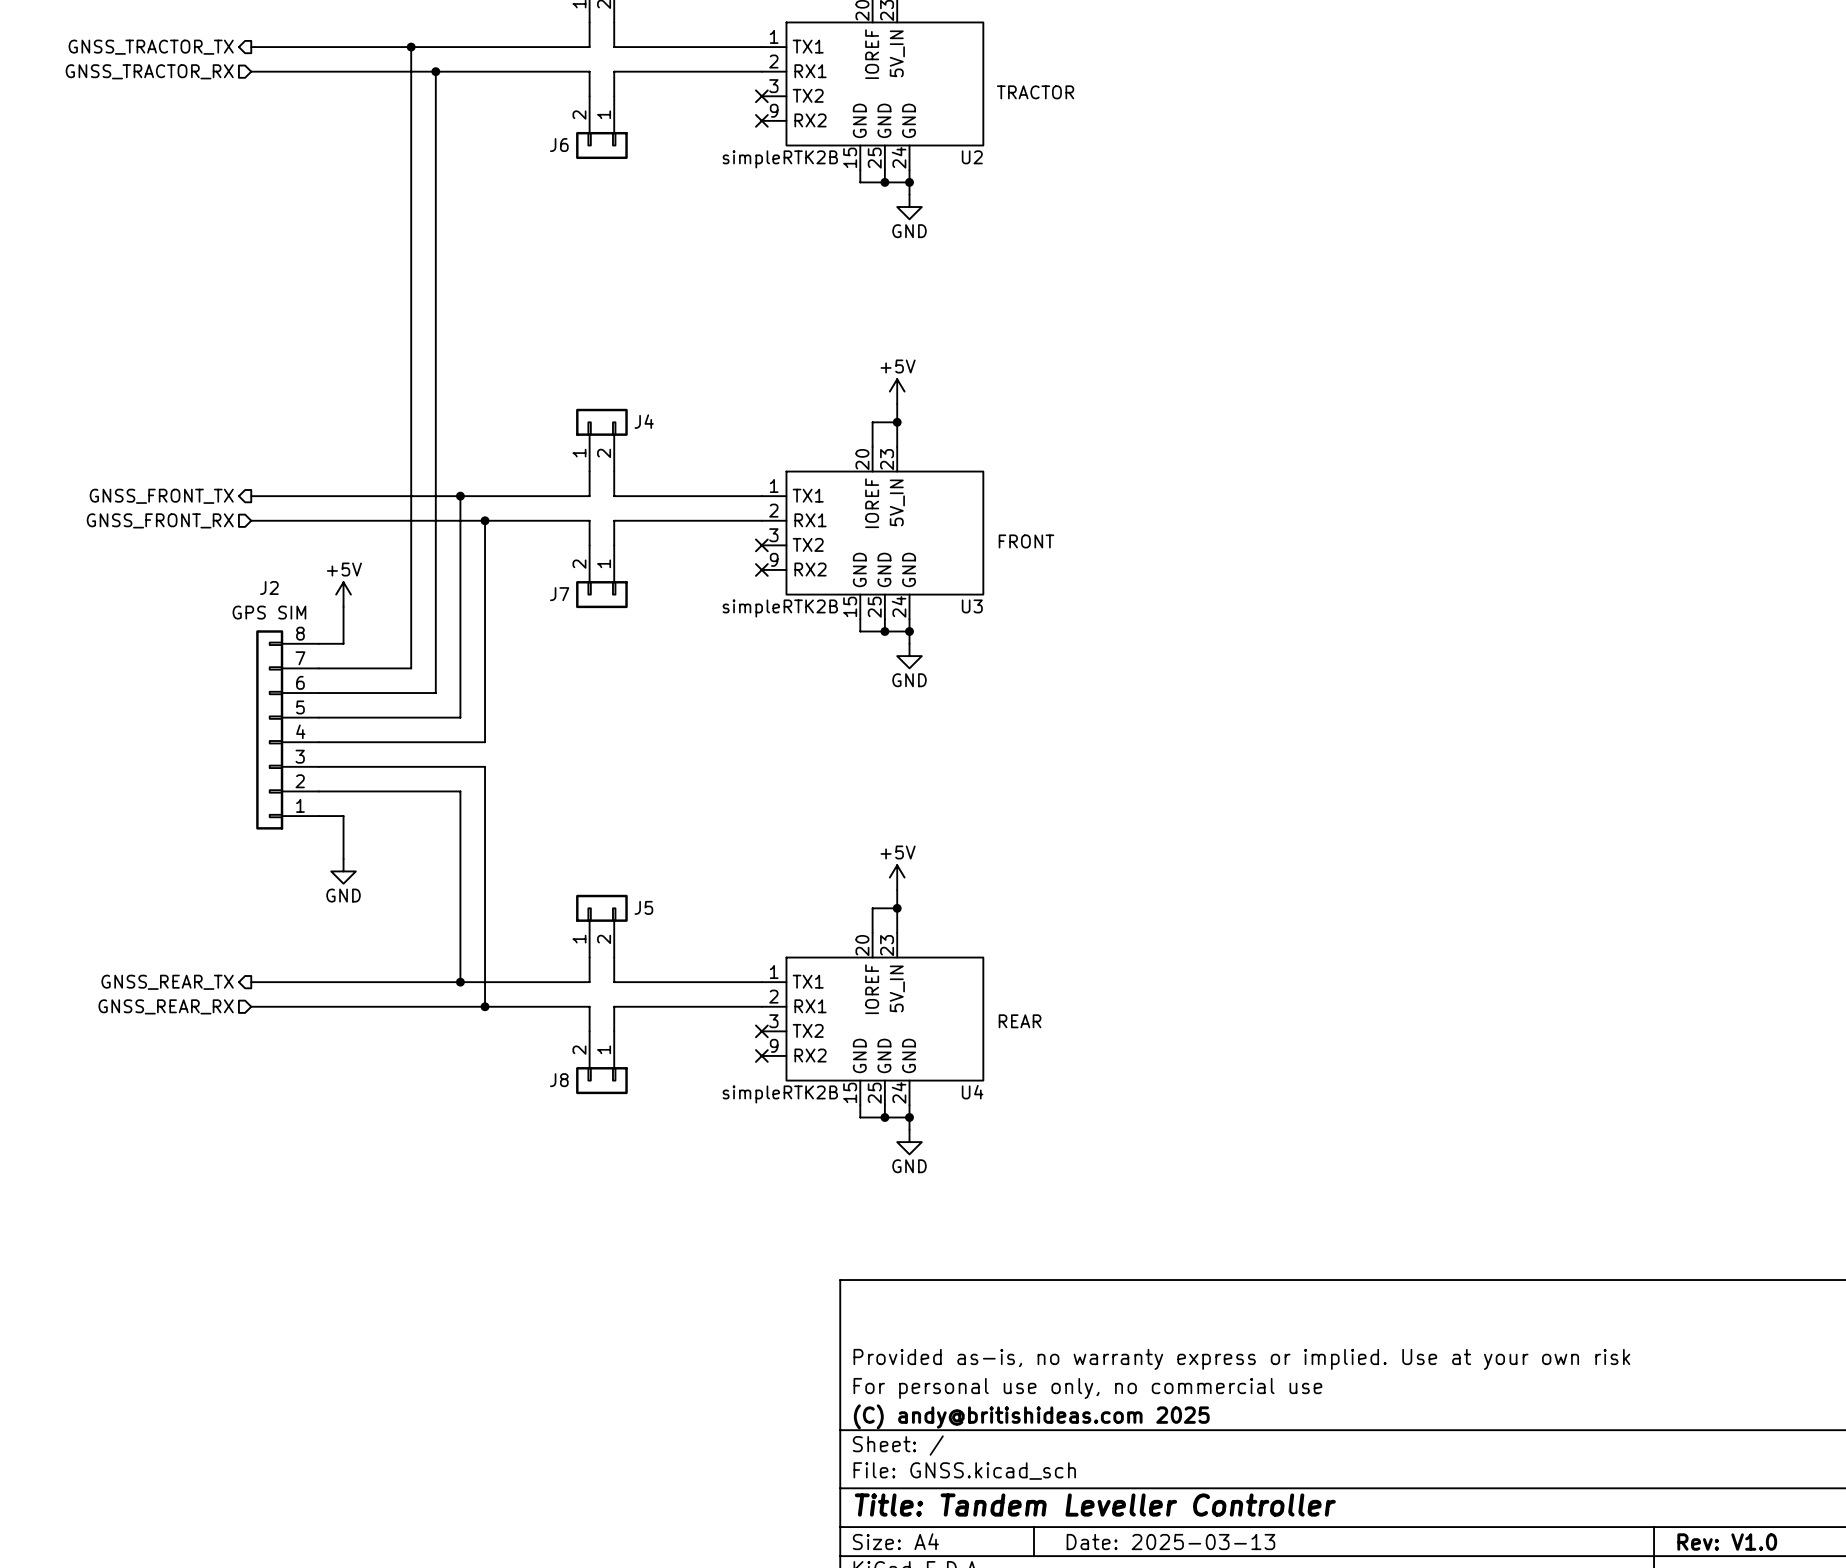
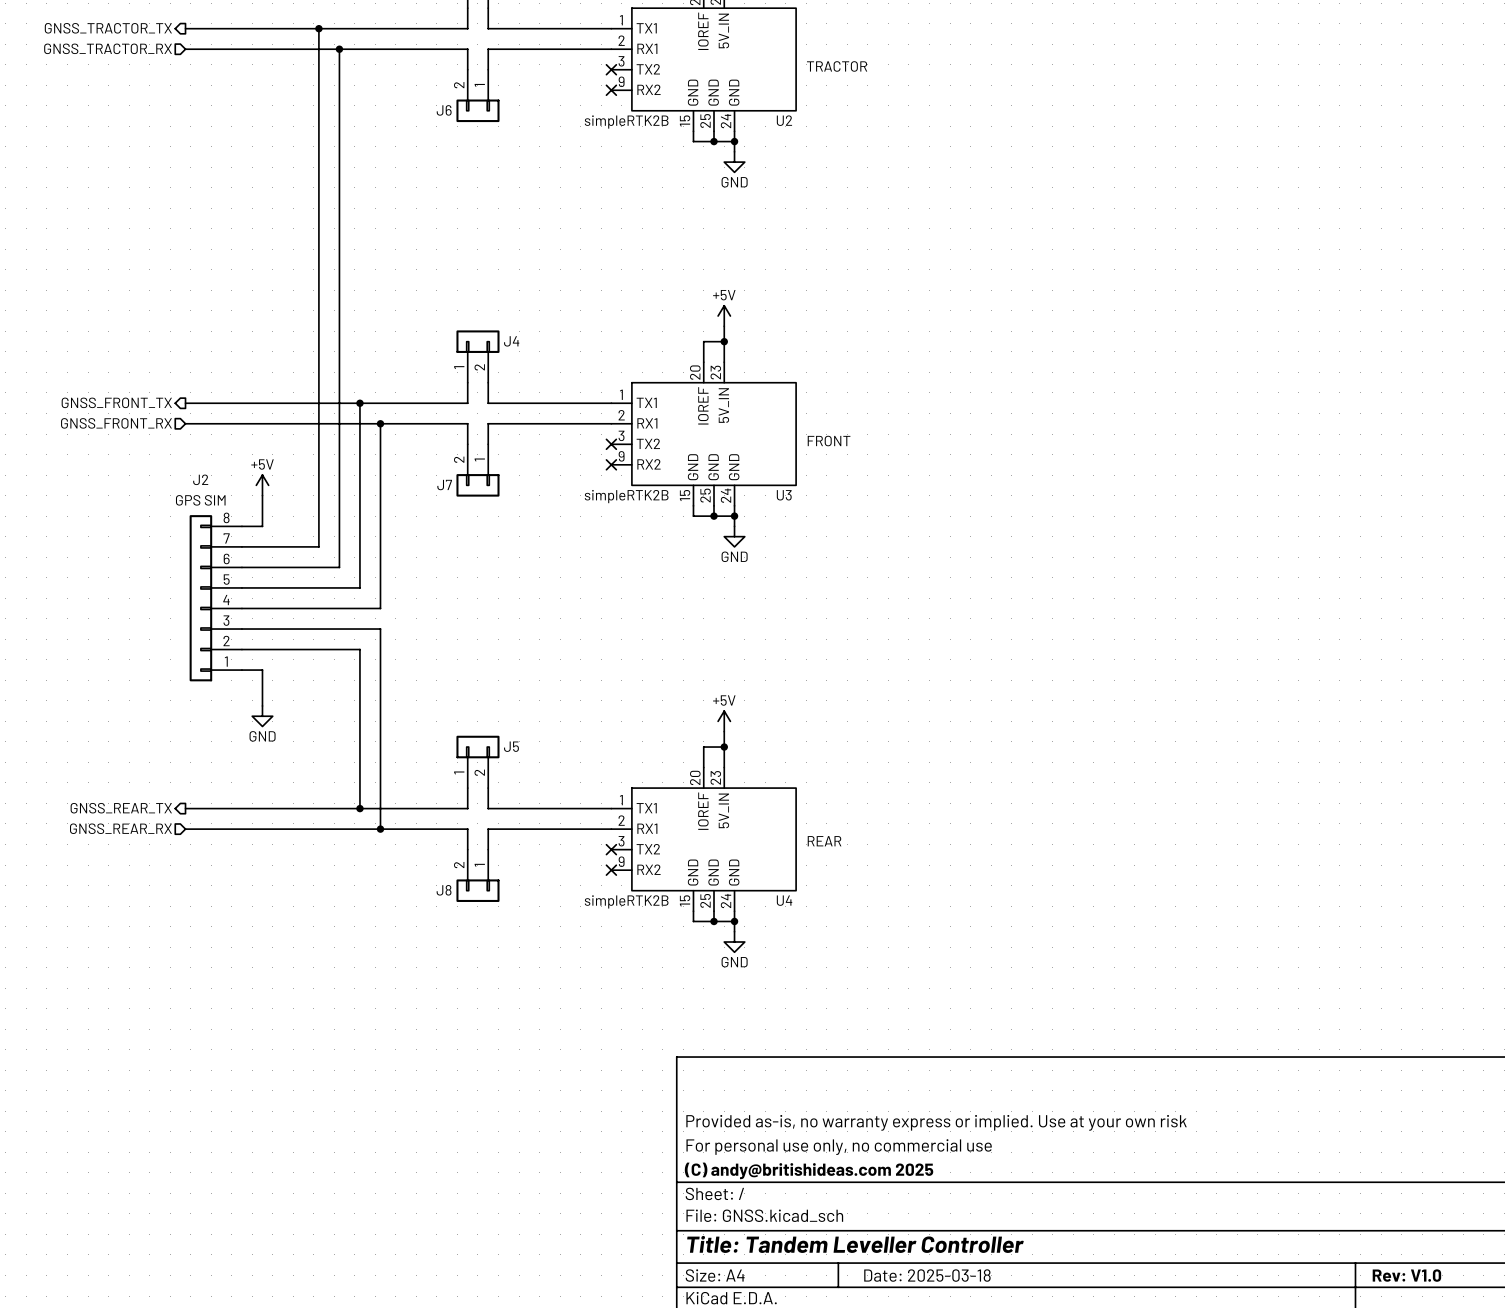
title block: Date: 2025-03-13 (1170, 1542) -> Date: 2025-03-18 (927, 1275)

